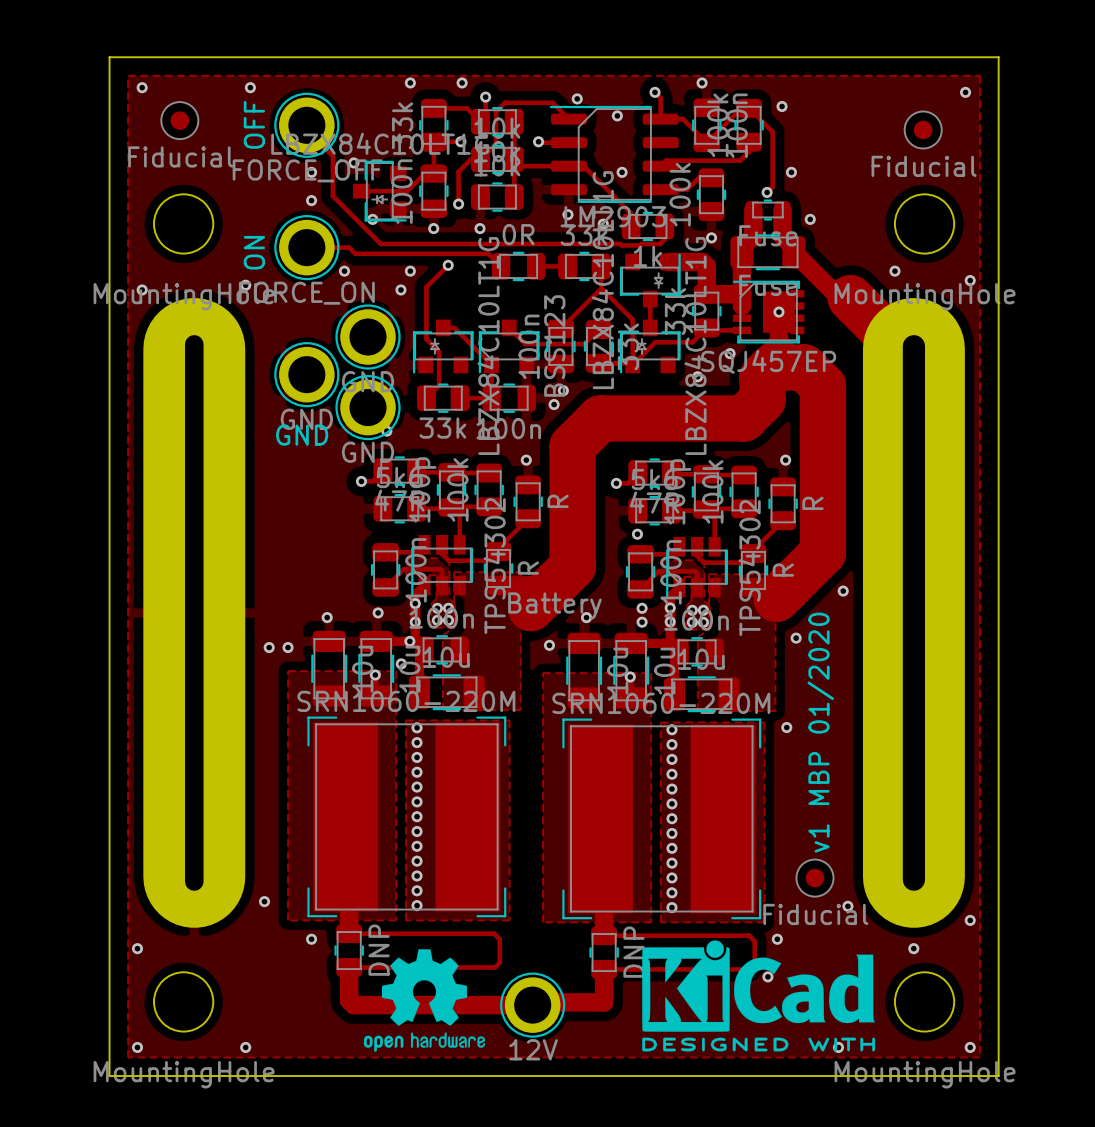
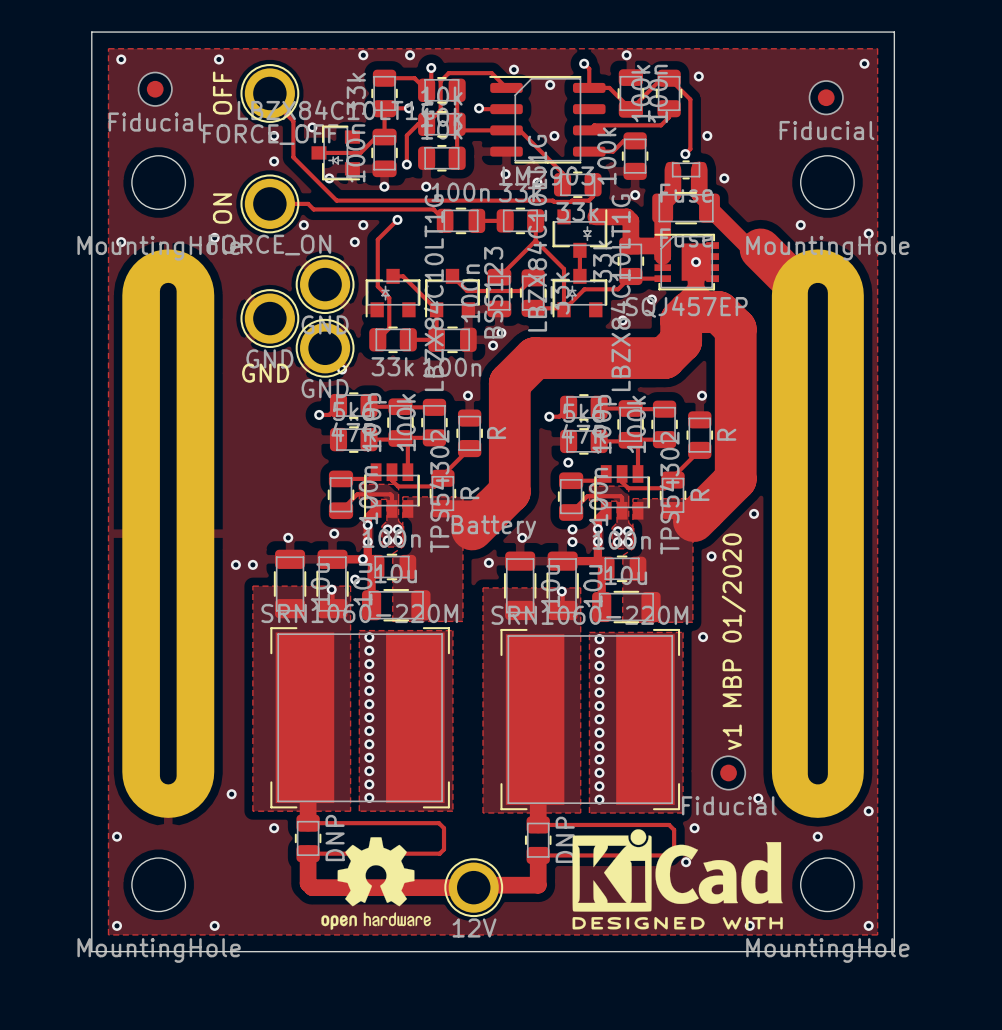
part value: 0R (518, 234) -> 100n (460, 192)
part value: 1k (647, 256) -> 33k (577, 211)

